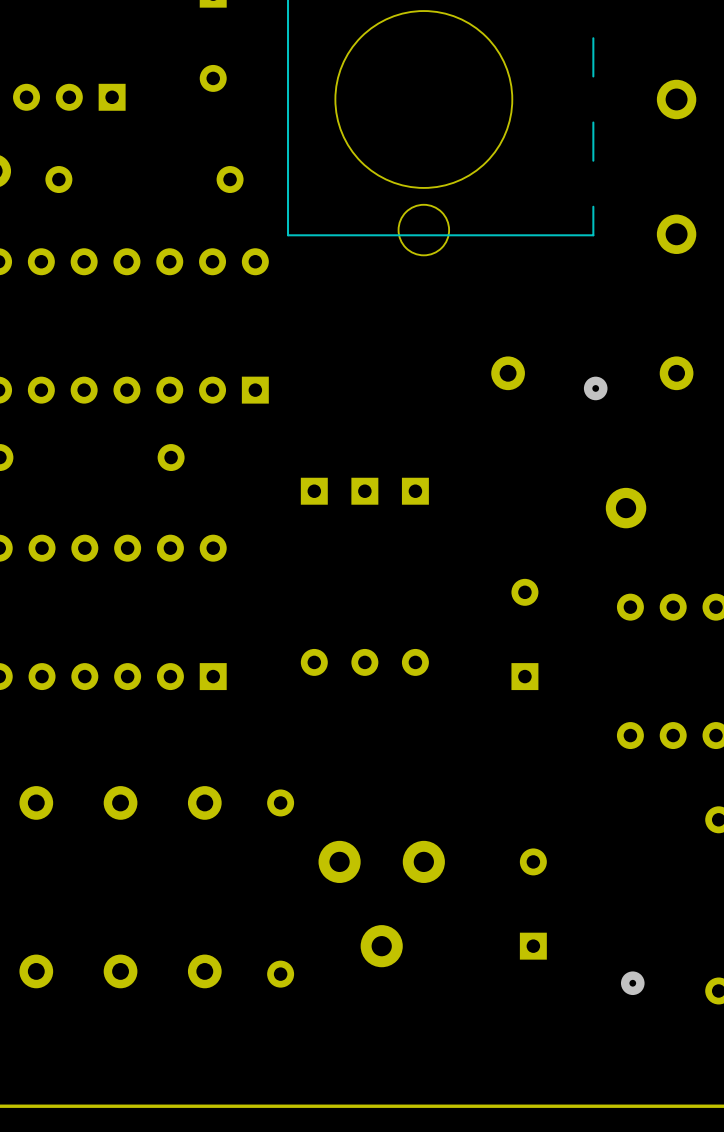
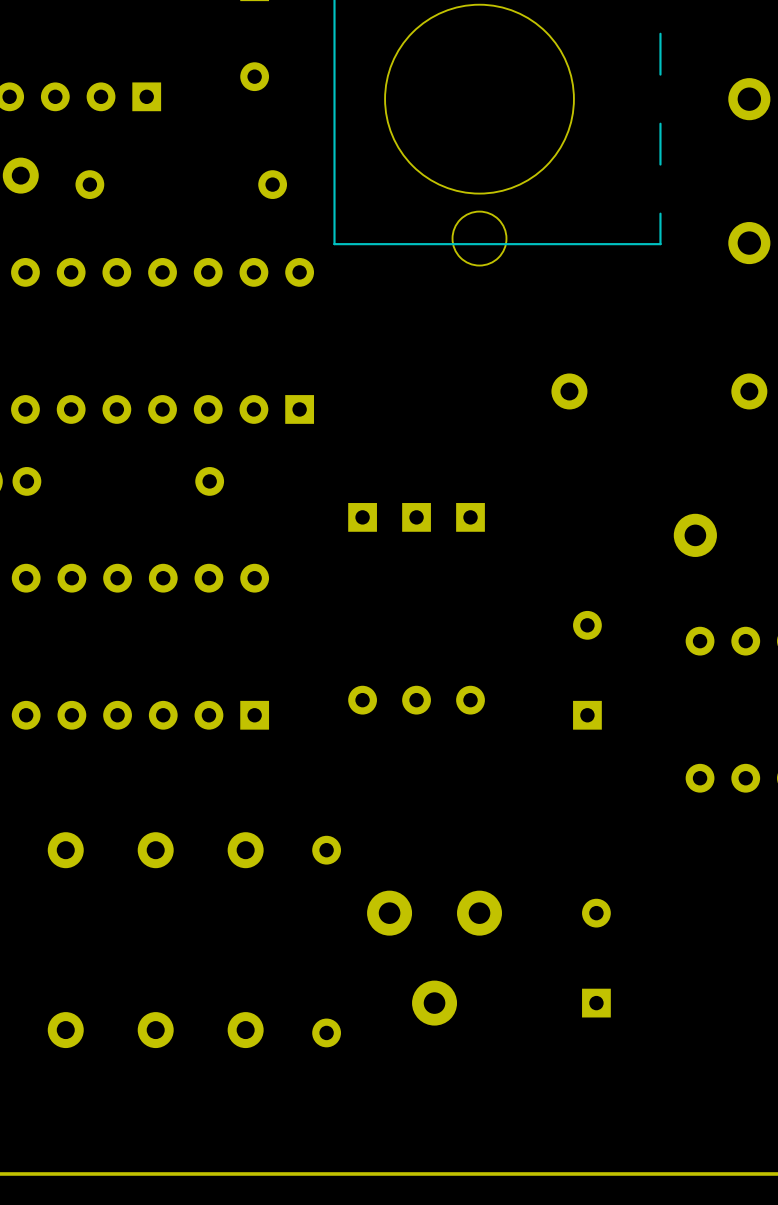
via: (595, 388) -> none
via: (632, 983) -> none

